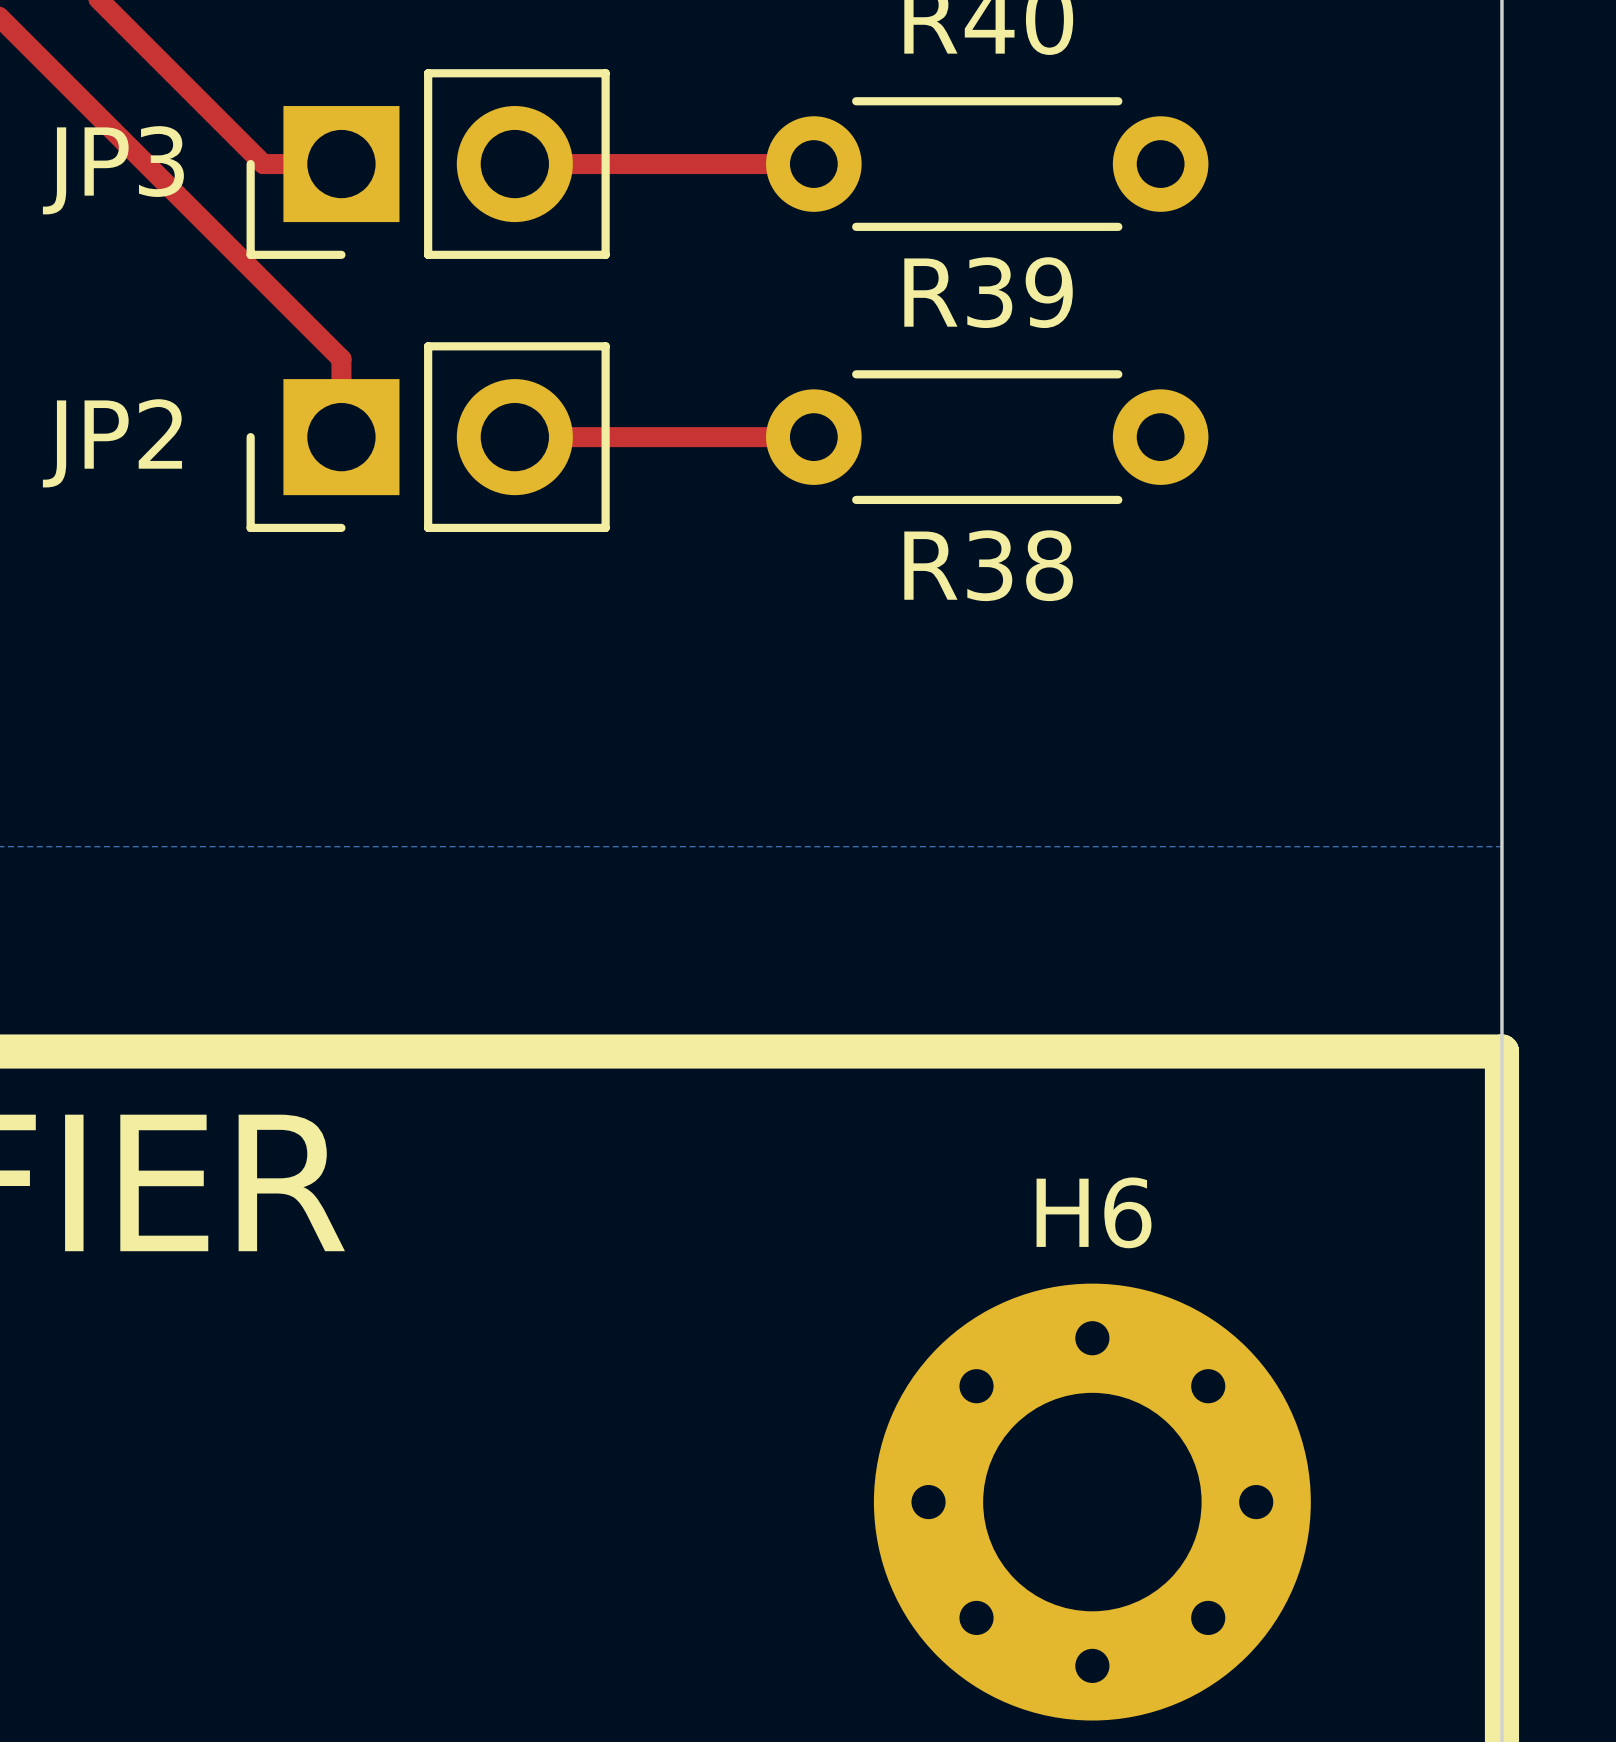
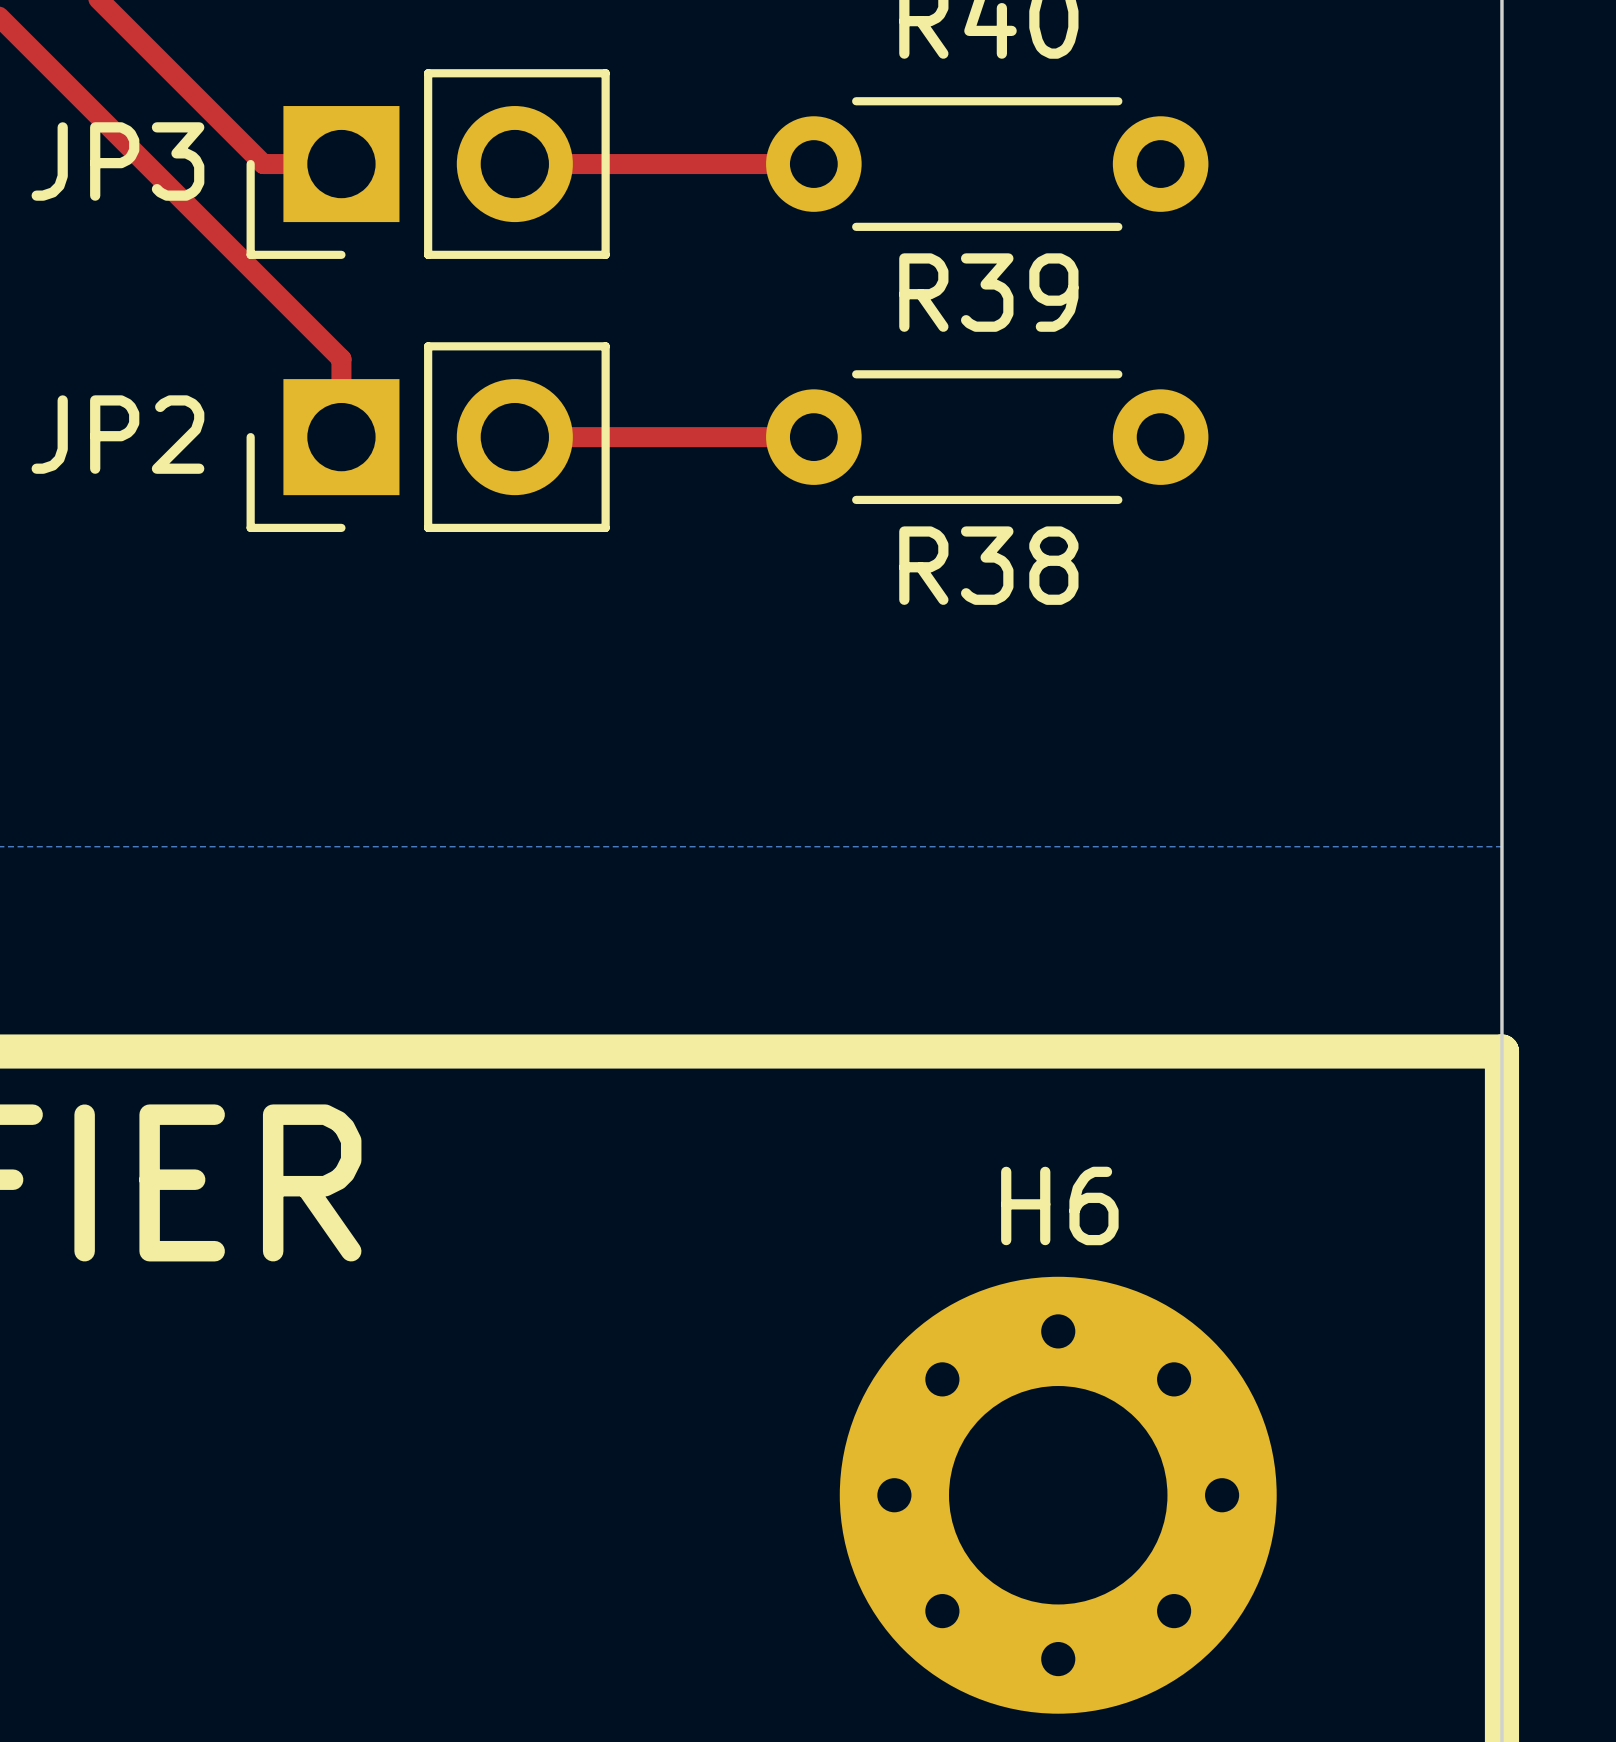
H6 position: (1092, 1502) -> (1058, 1495)

